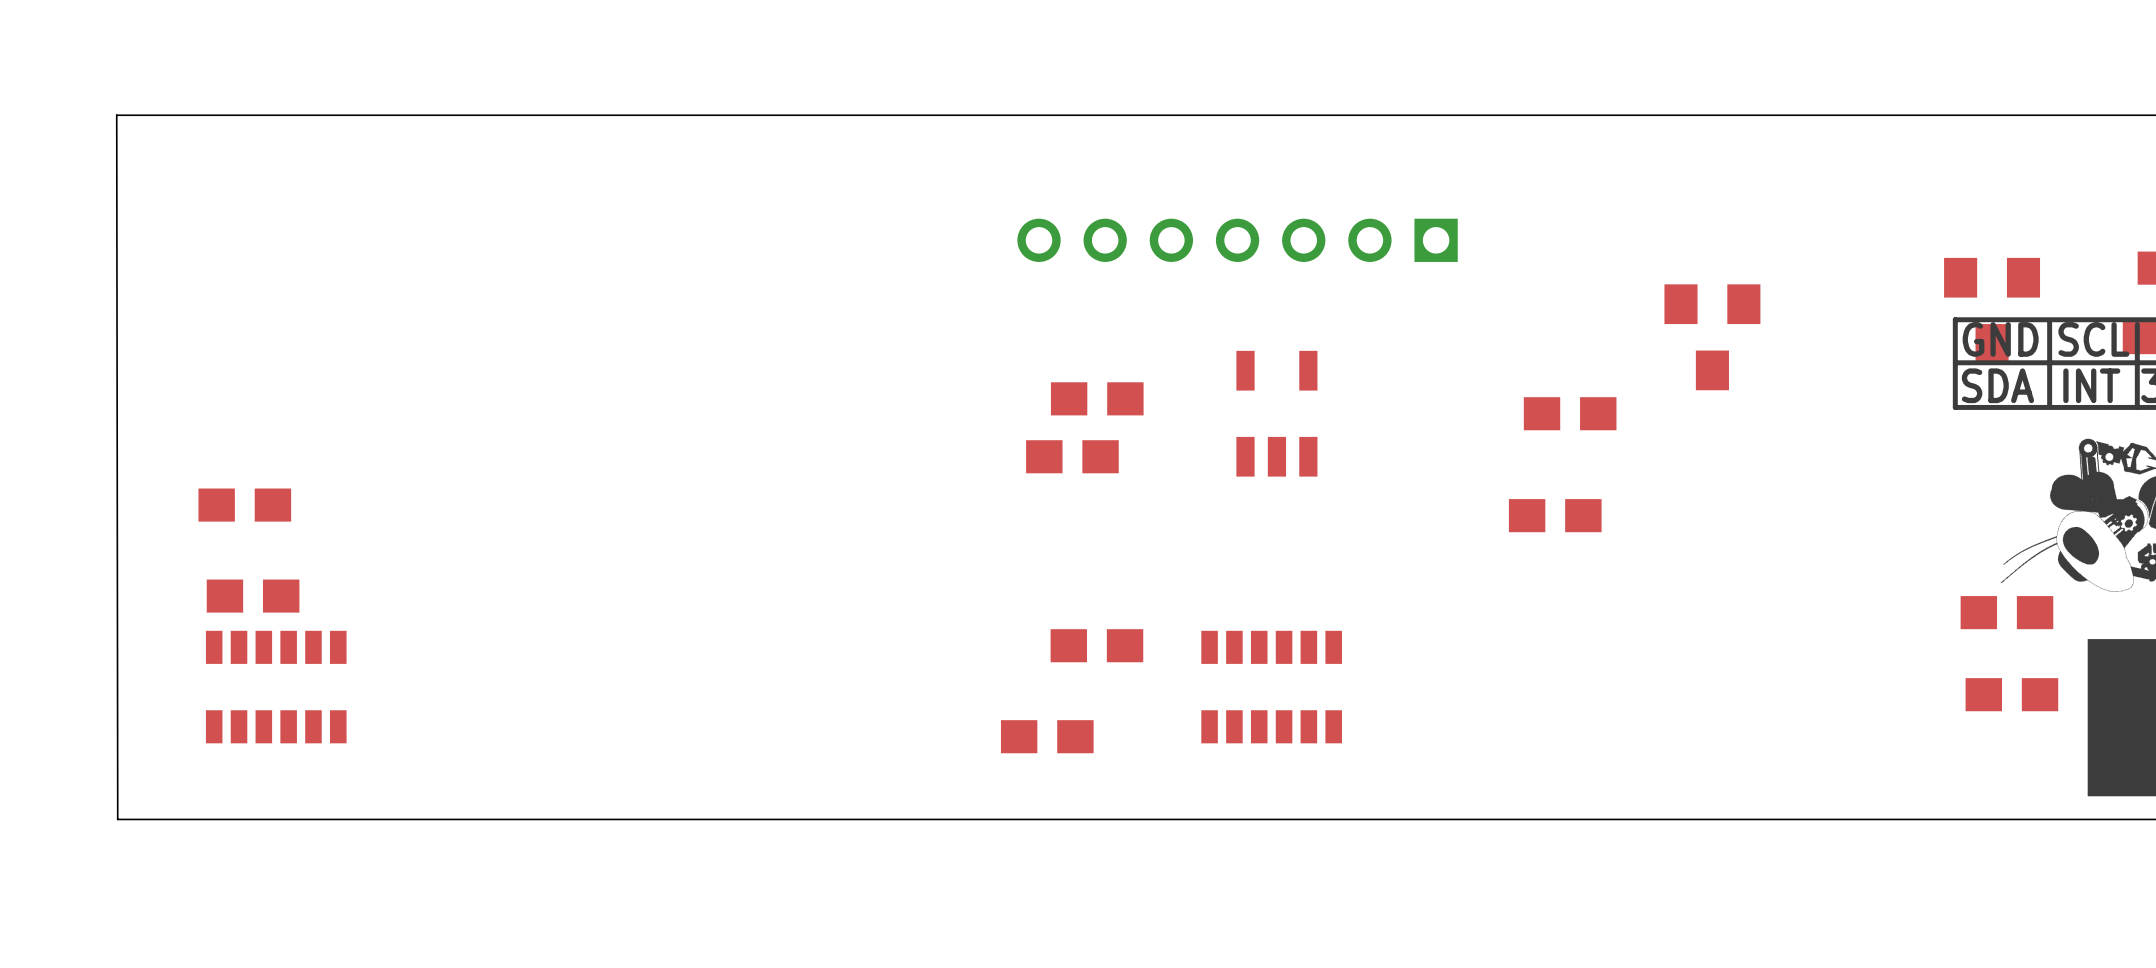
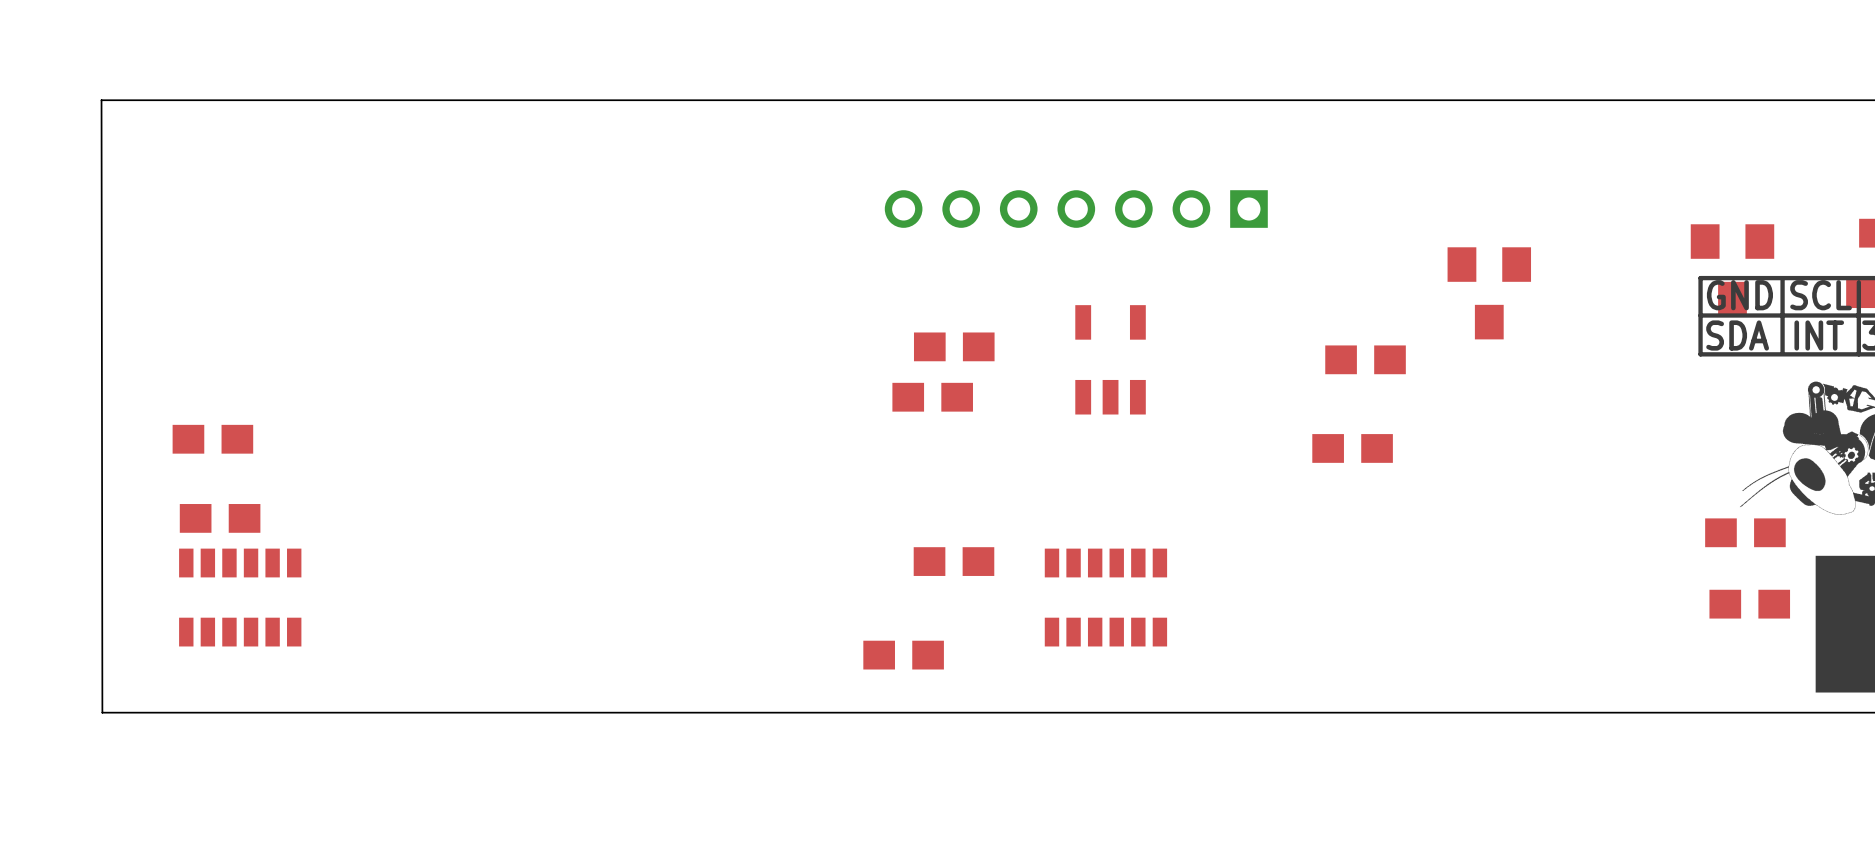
part position: (1047, 736) -> (903, 655)

